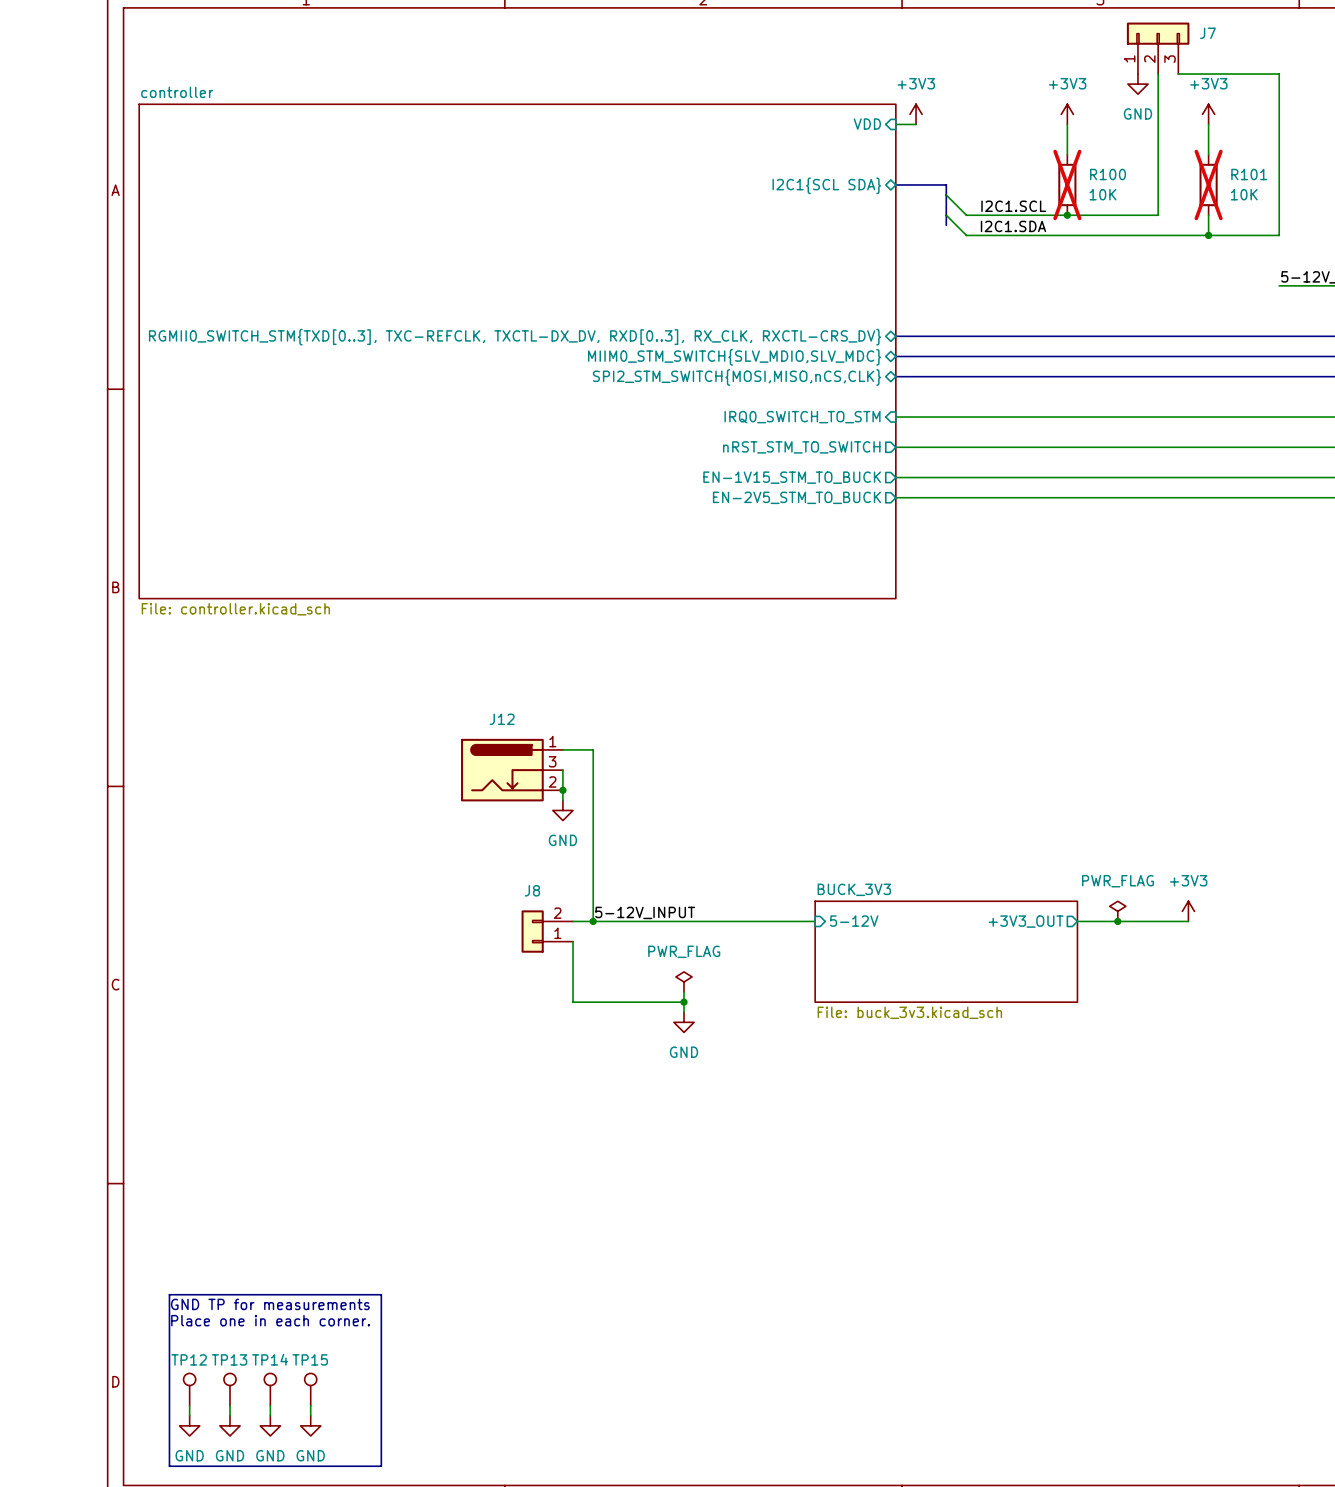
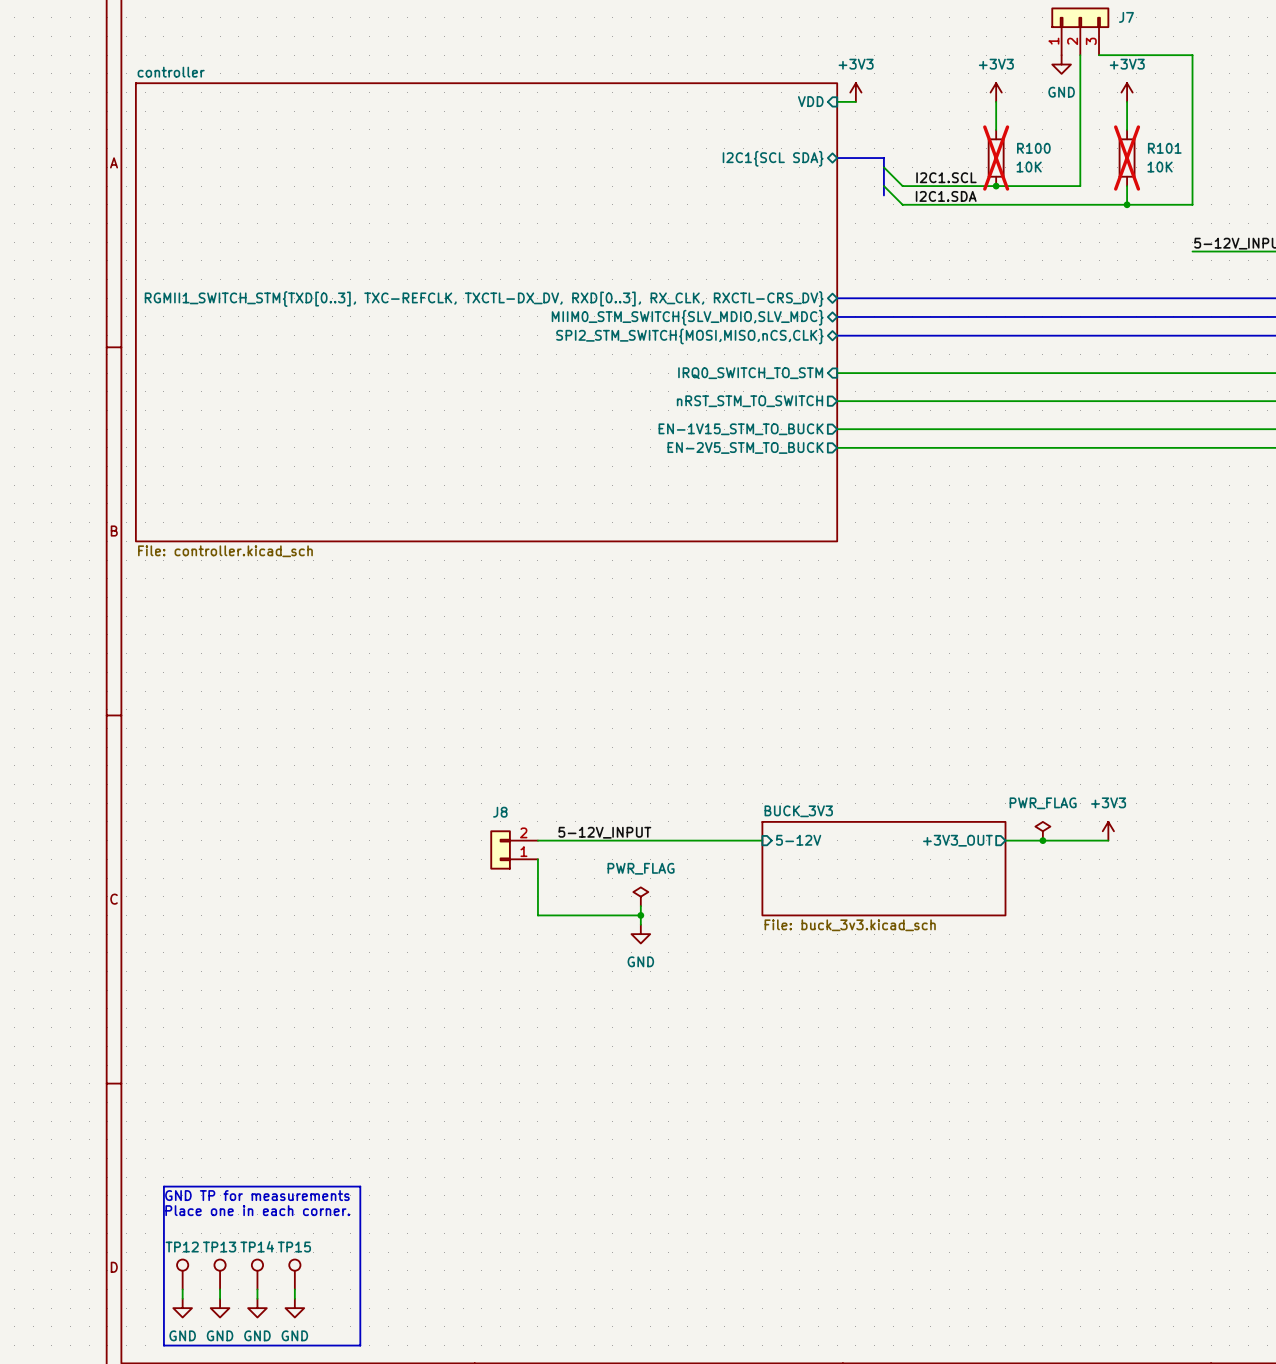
sheet pin: RGMII0_SWITCH_STM{TXD[0..3], TXC-REFCLK, TXCTL-DX_DV, RXD[0..3], RX_CLK, RXCTL-CRS_DV} (514, 337) -> RGMII1_SWITCH_STM{TXD[0..3], TXC-REFCLK, TXCTL-DX_DV, RXD[0..3], RX_CLK, RXCTL-CRS_DV} (484, 299)
wire: (562, 749) (593, 749) (593, 921) -> none
J12: (511, 770) -> none
wire: (562, 770) (562, 800) -> none
junction: (562, 790) -> none
power symbol: GND (562, 810) -> none
junction: (593, 921) -> none

